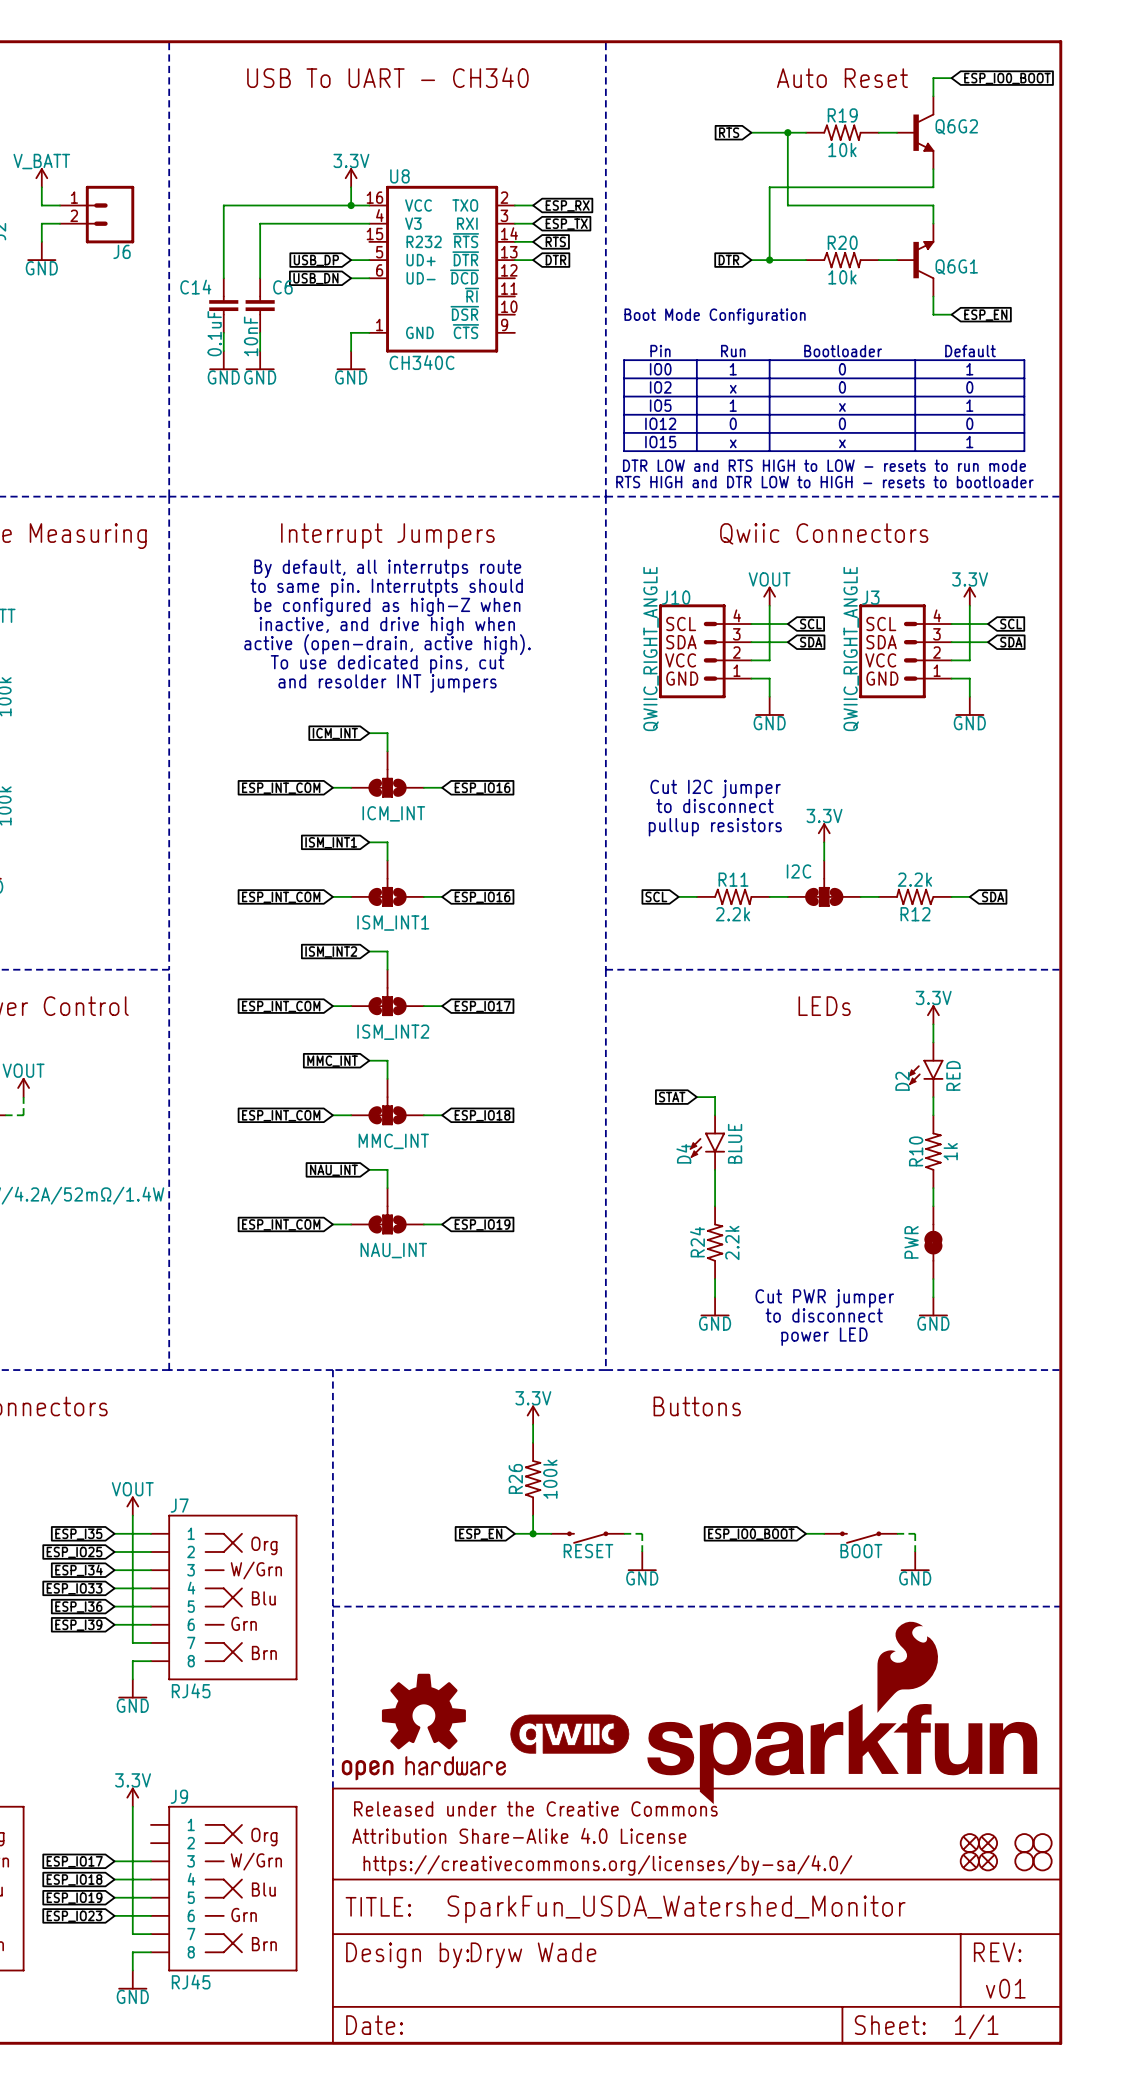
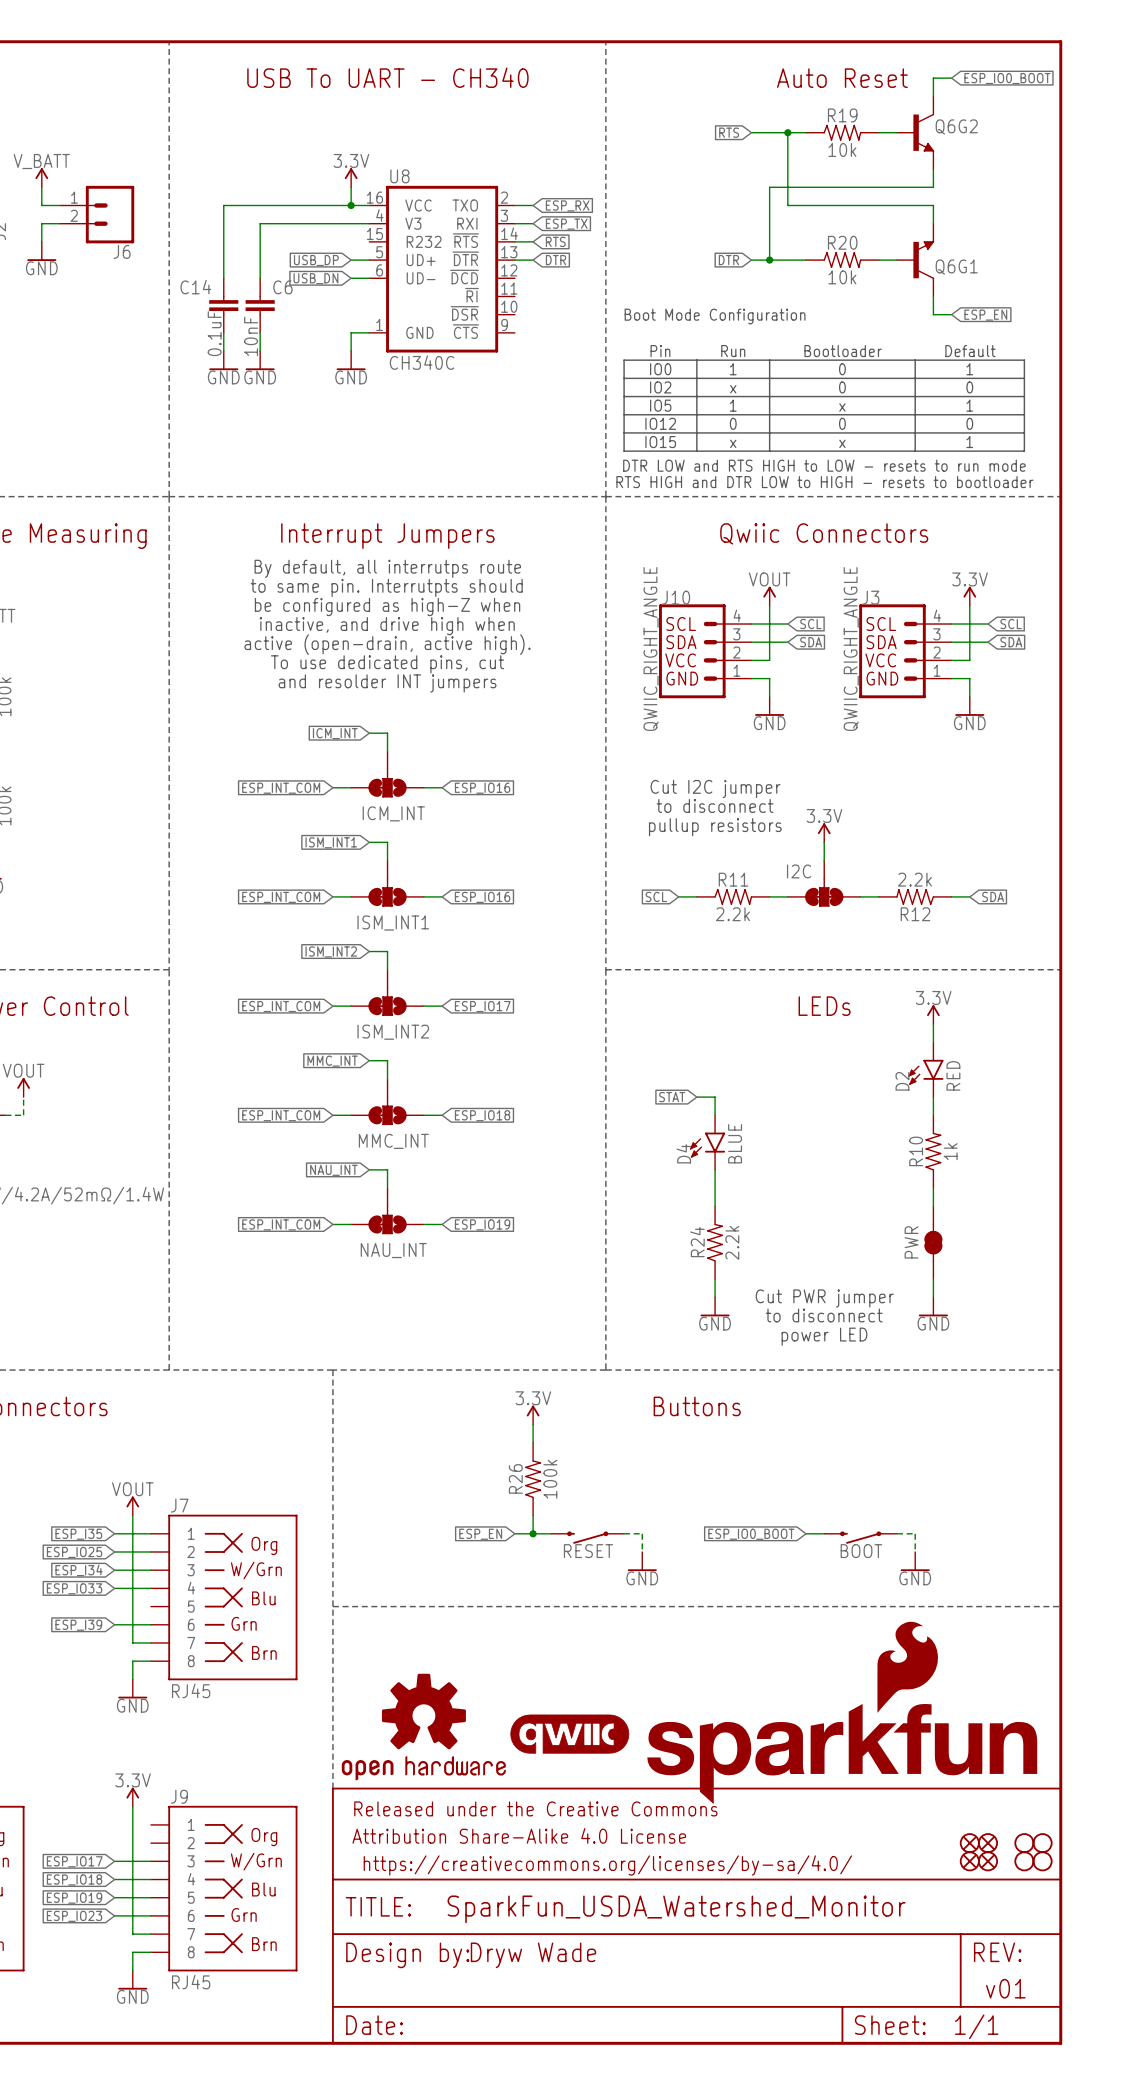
wire: (114, 1606) (150, 1606) -> none
global label: ESP_I36 (78, 1607) -> none

